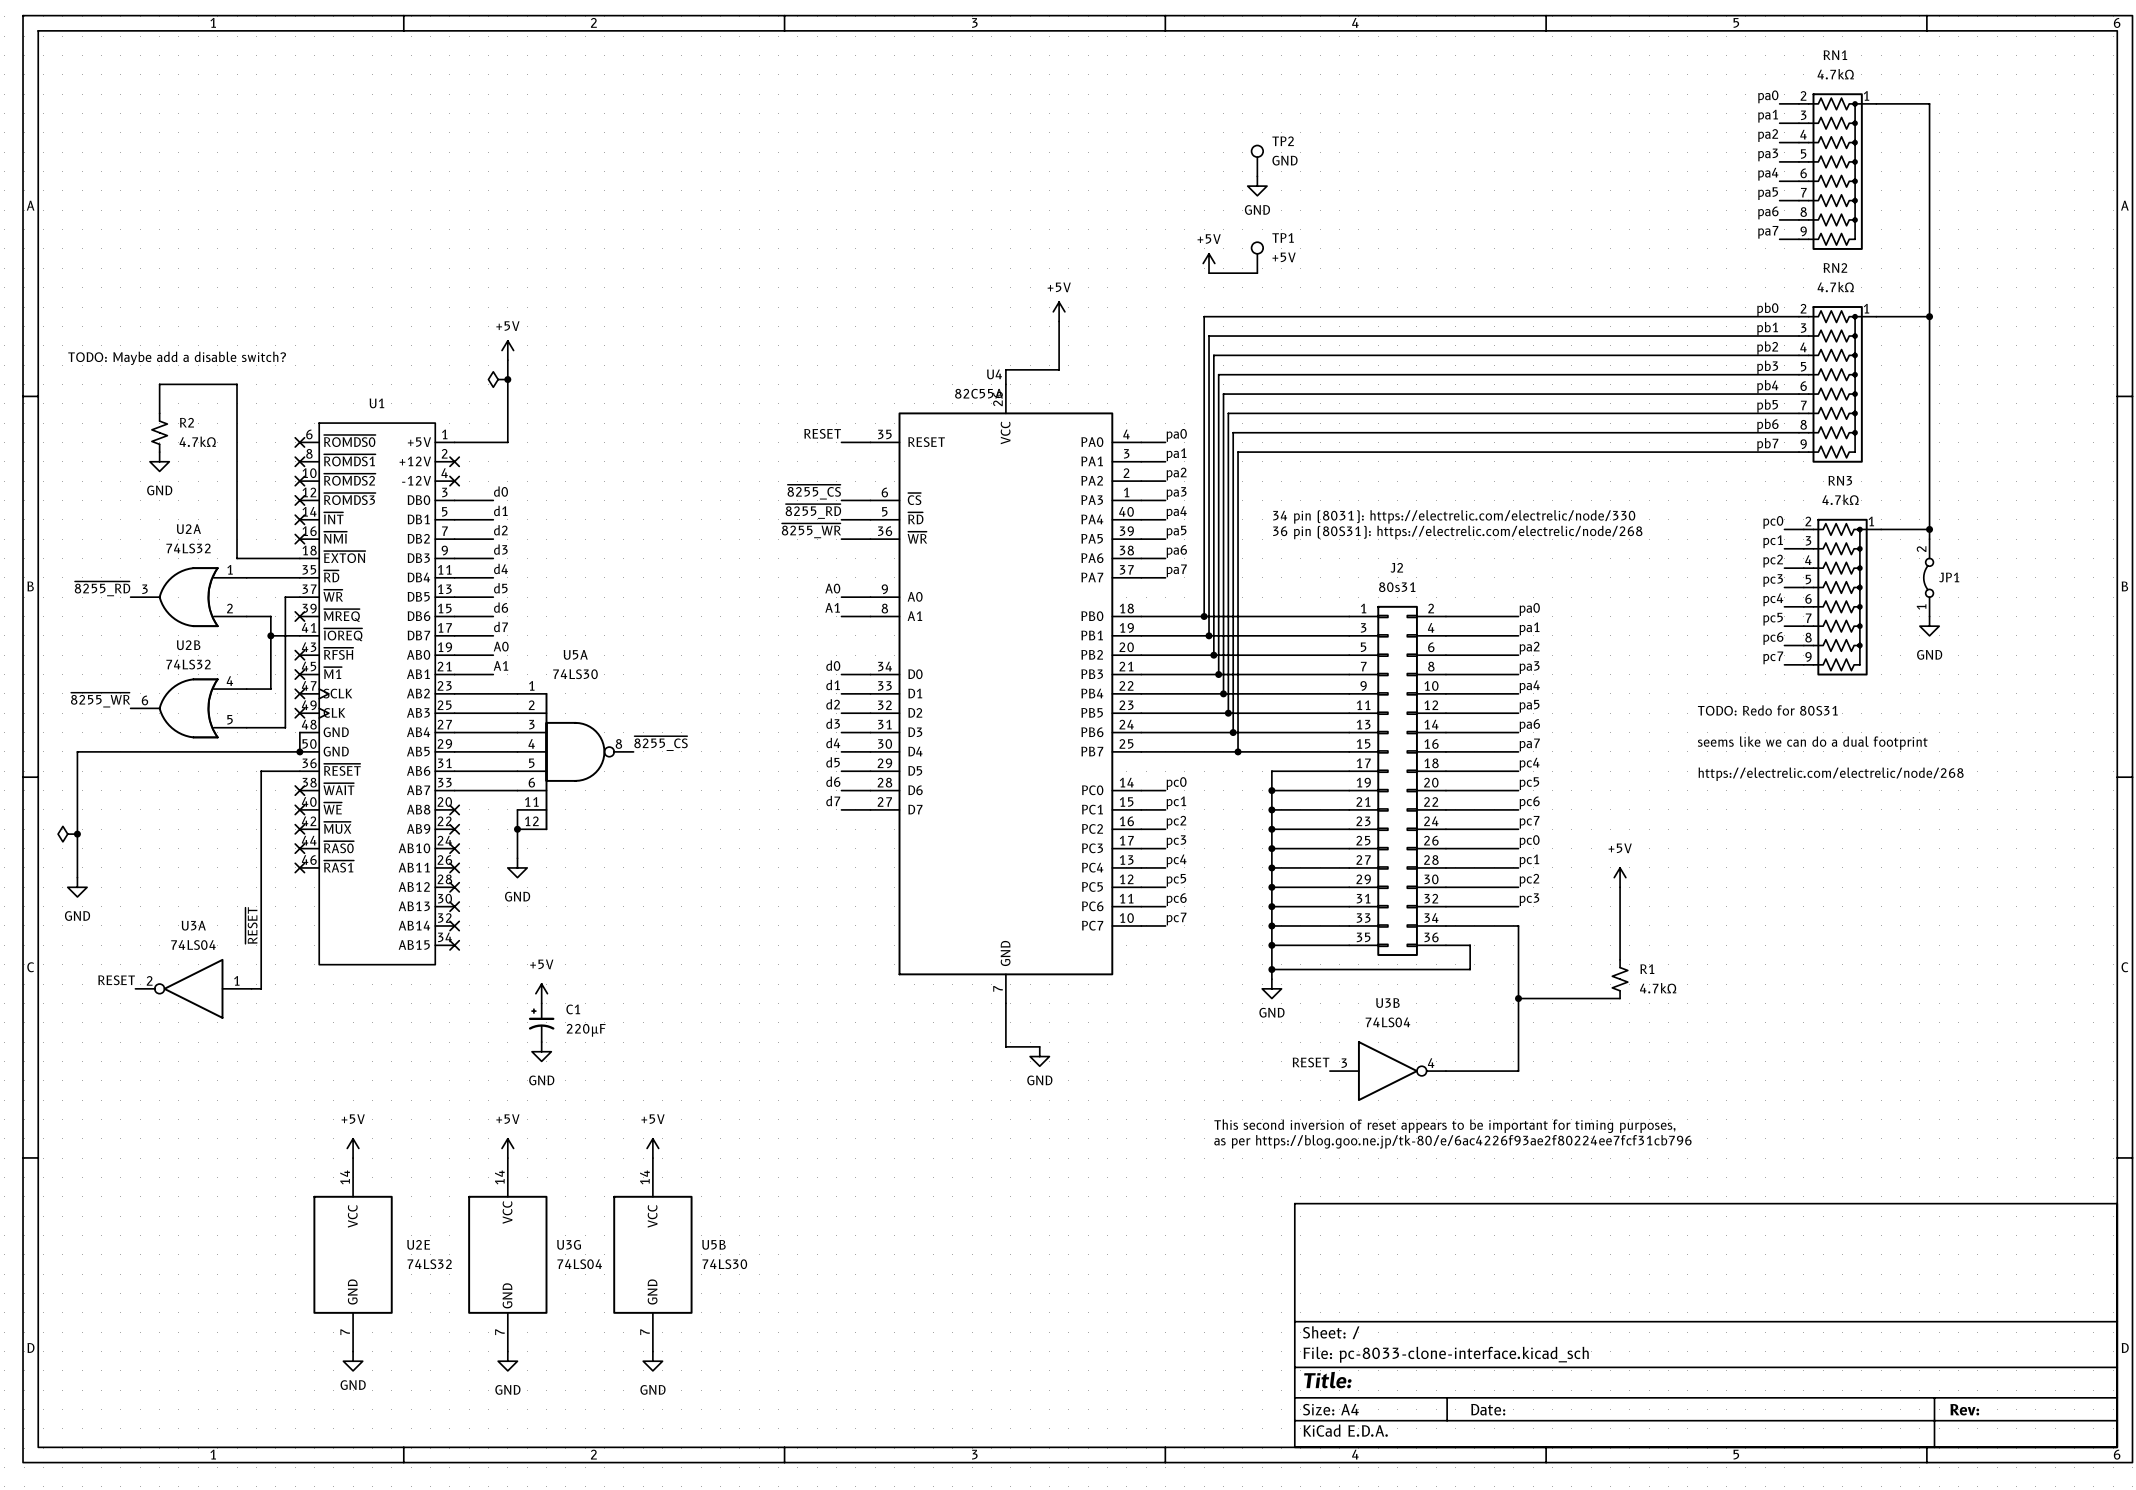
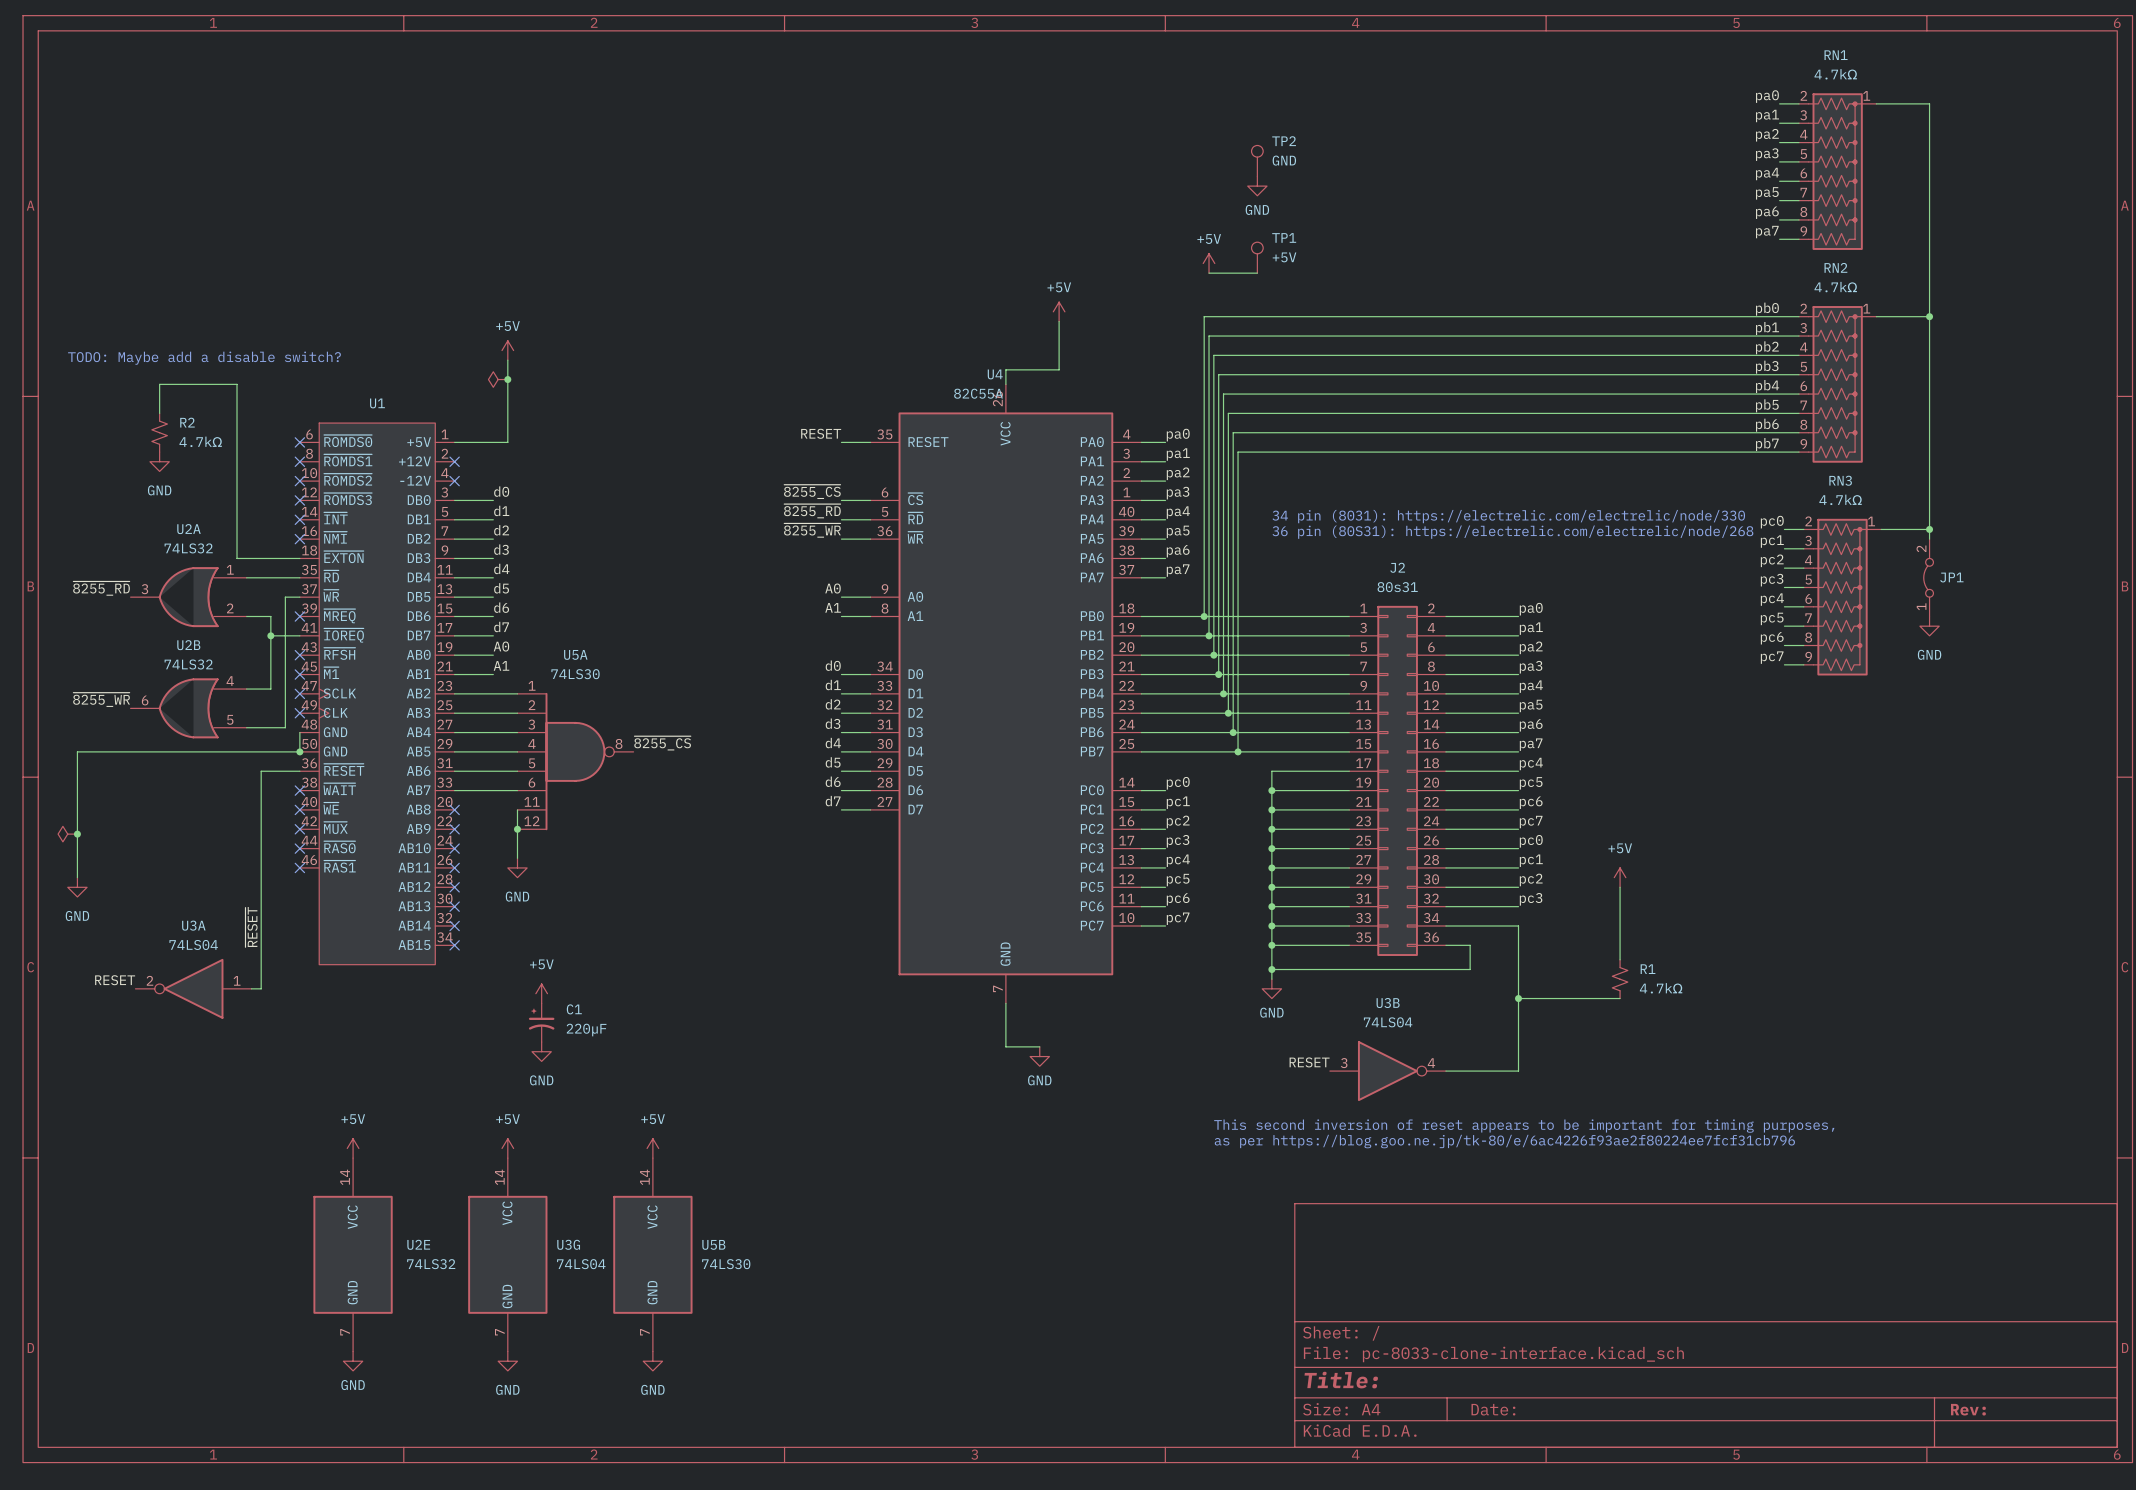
text: TODO: Redo for 80S31 (1767, 710) -> none
text: seems like we can do a dual footprint (1812, 743) -> none
text: https://electrelic.com/electrelic/node/268 (1831, 774) -> none

